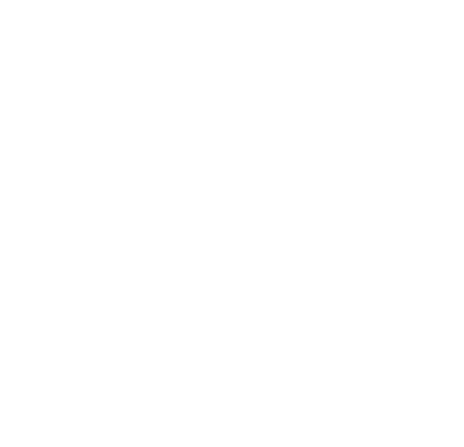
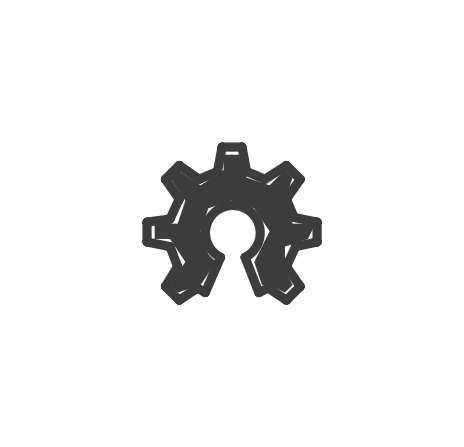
drawing: none -> [142, 142, 322, 305]

